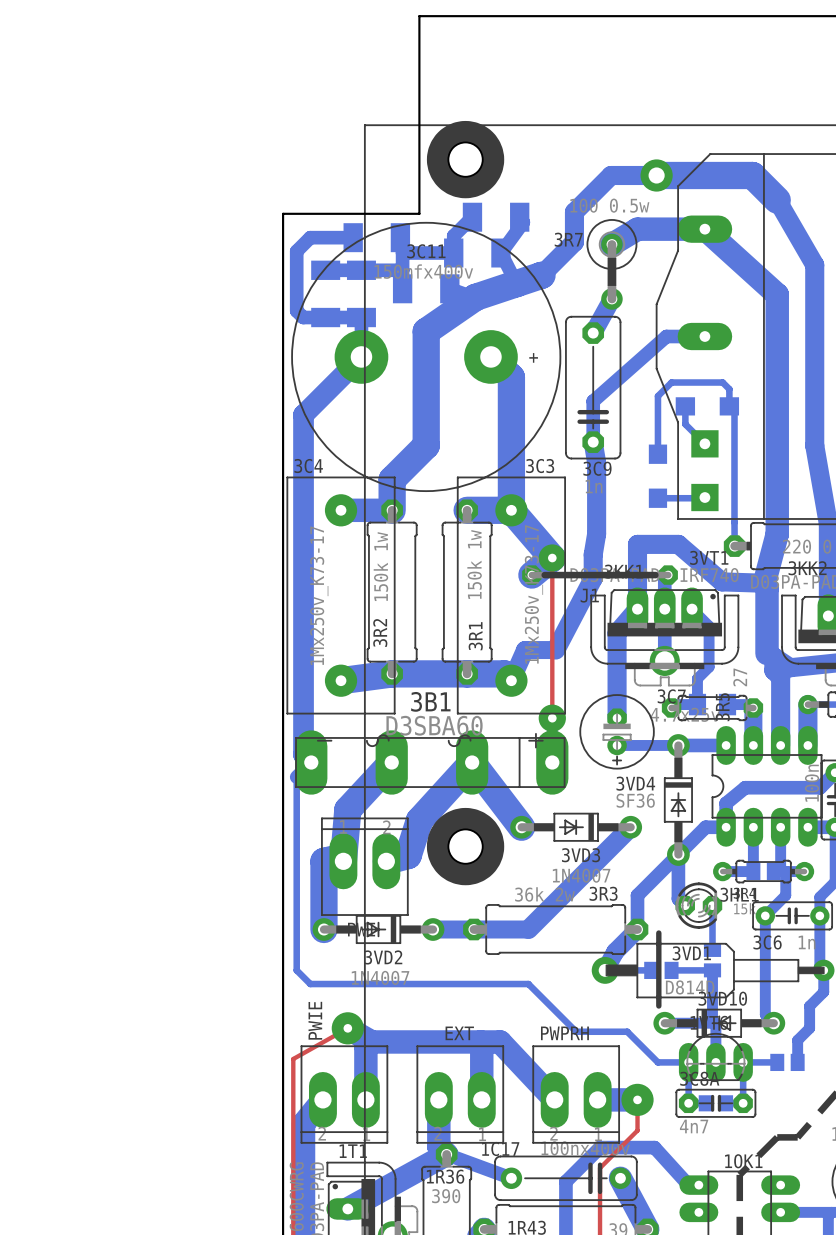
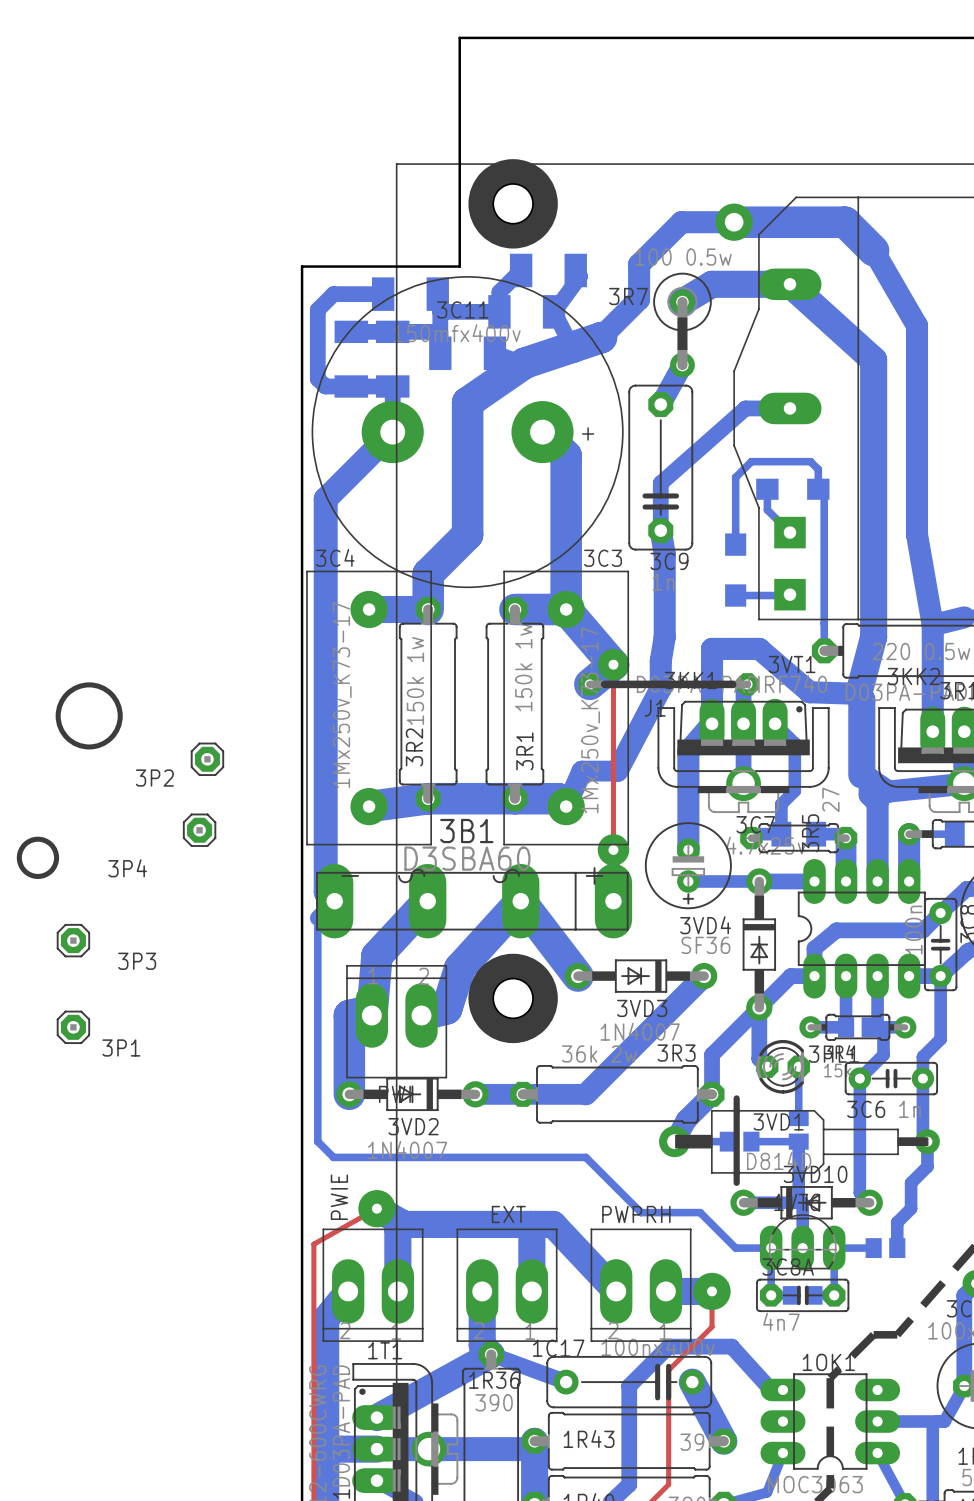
drawing: none -> [55, 682, 123, 750]
3P2: none -> (207, 759)
3P4: none -> (199, 830)
drawing: none -> [16, 836, 60, 879]
3P3: none -> (73, 940)
3P1: none -> (73, 1027)

